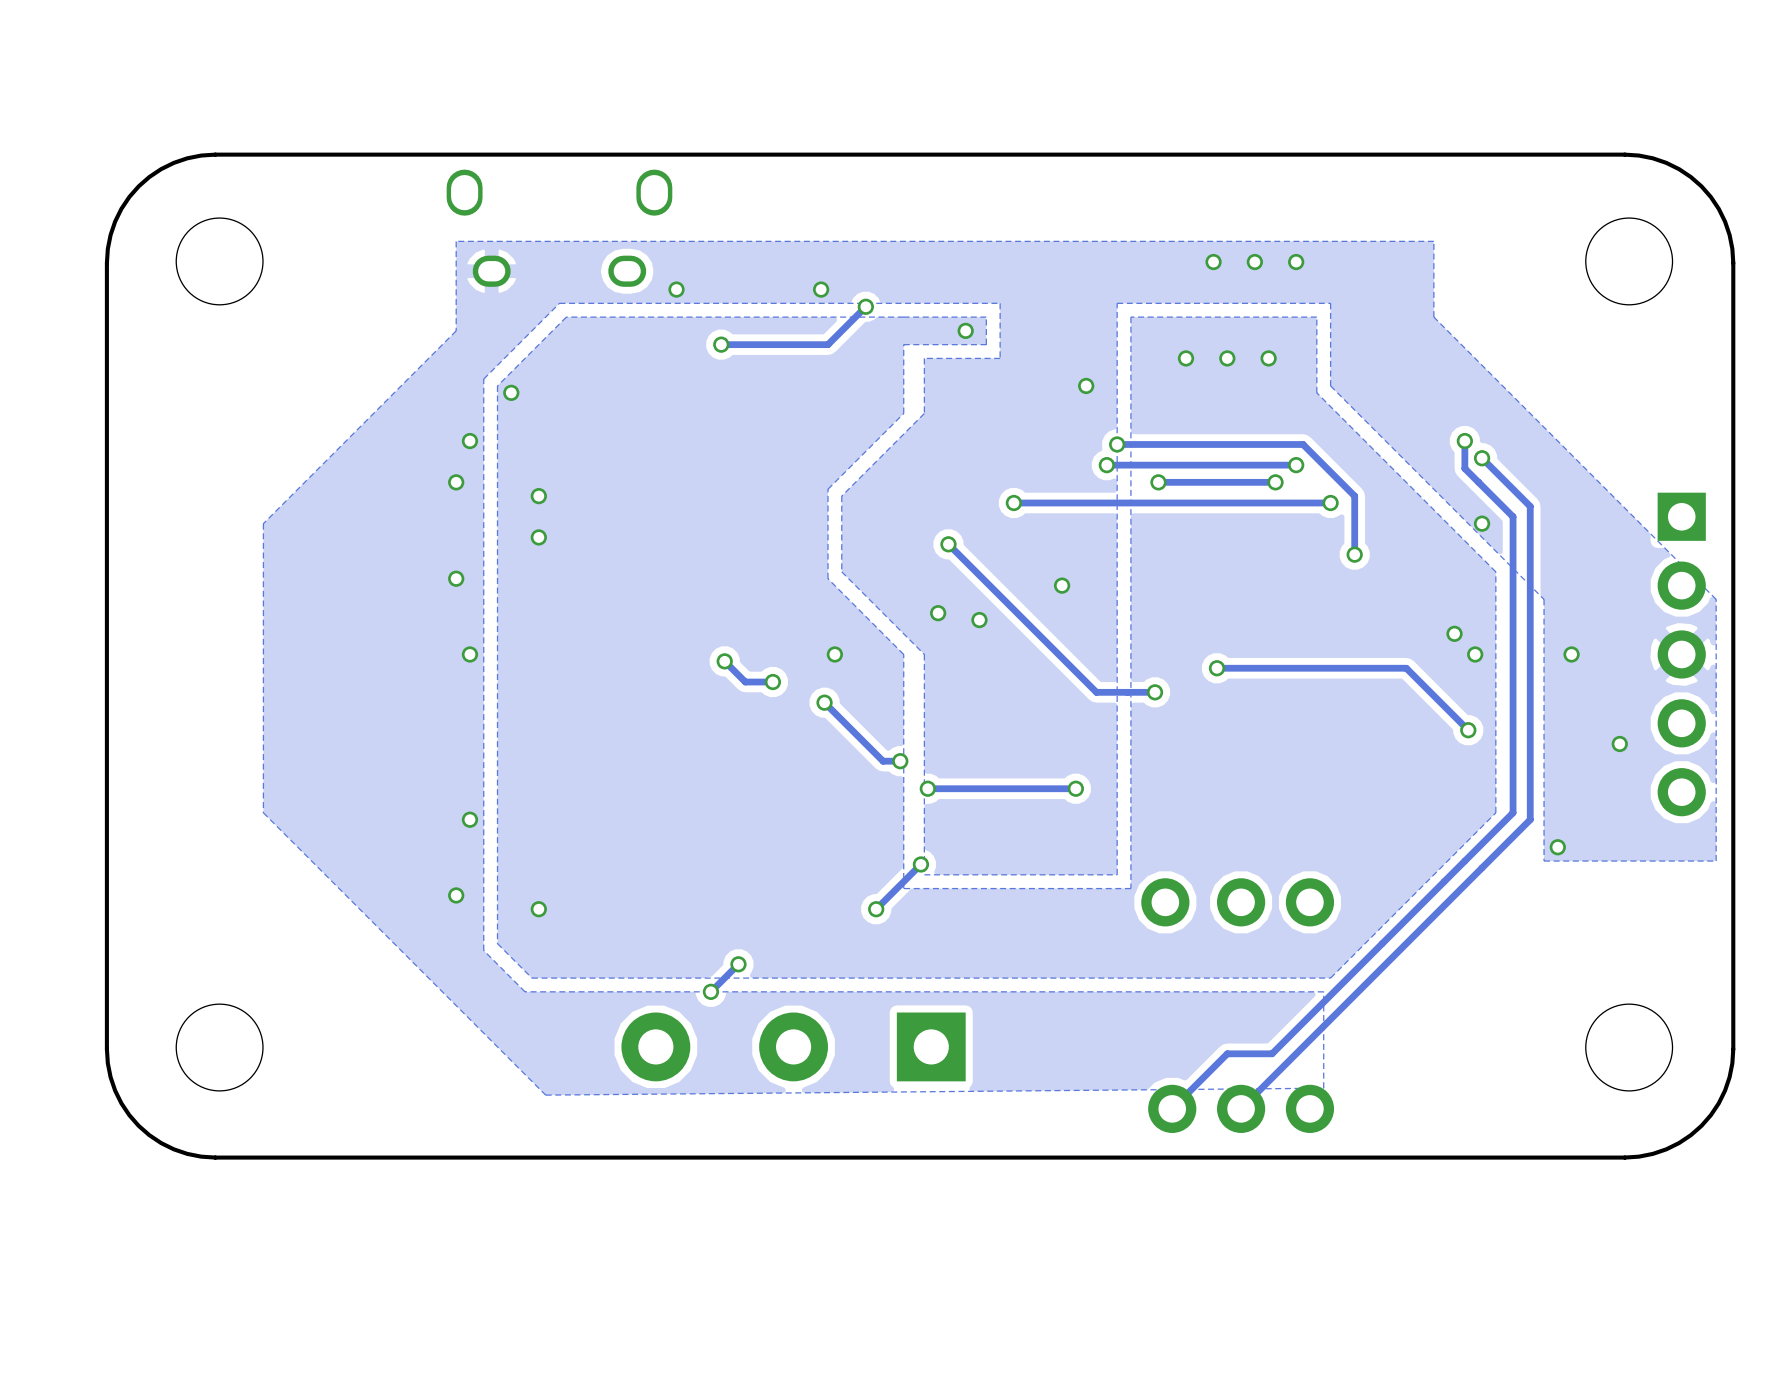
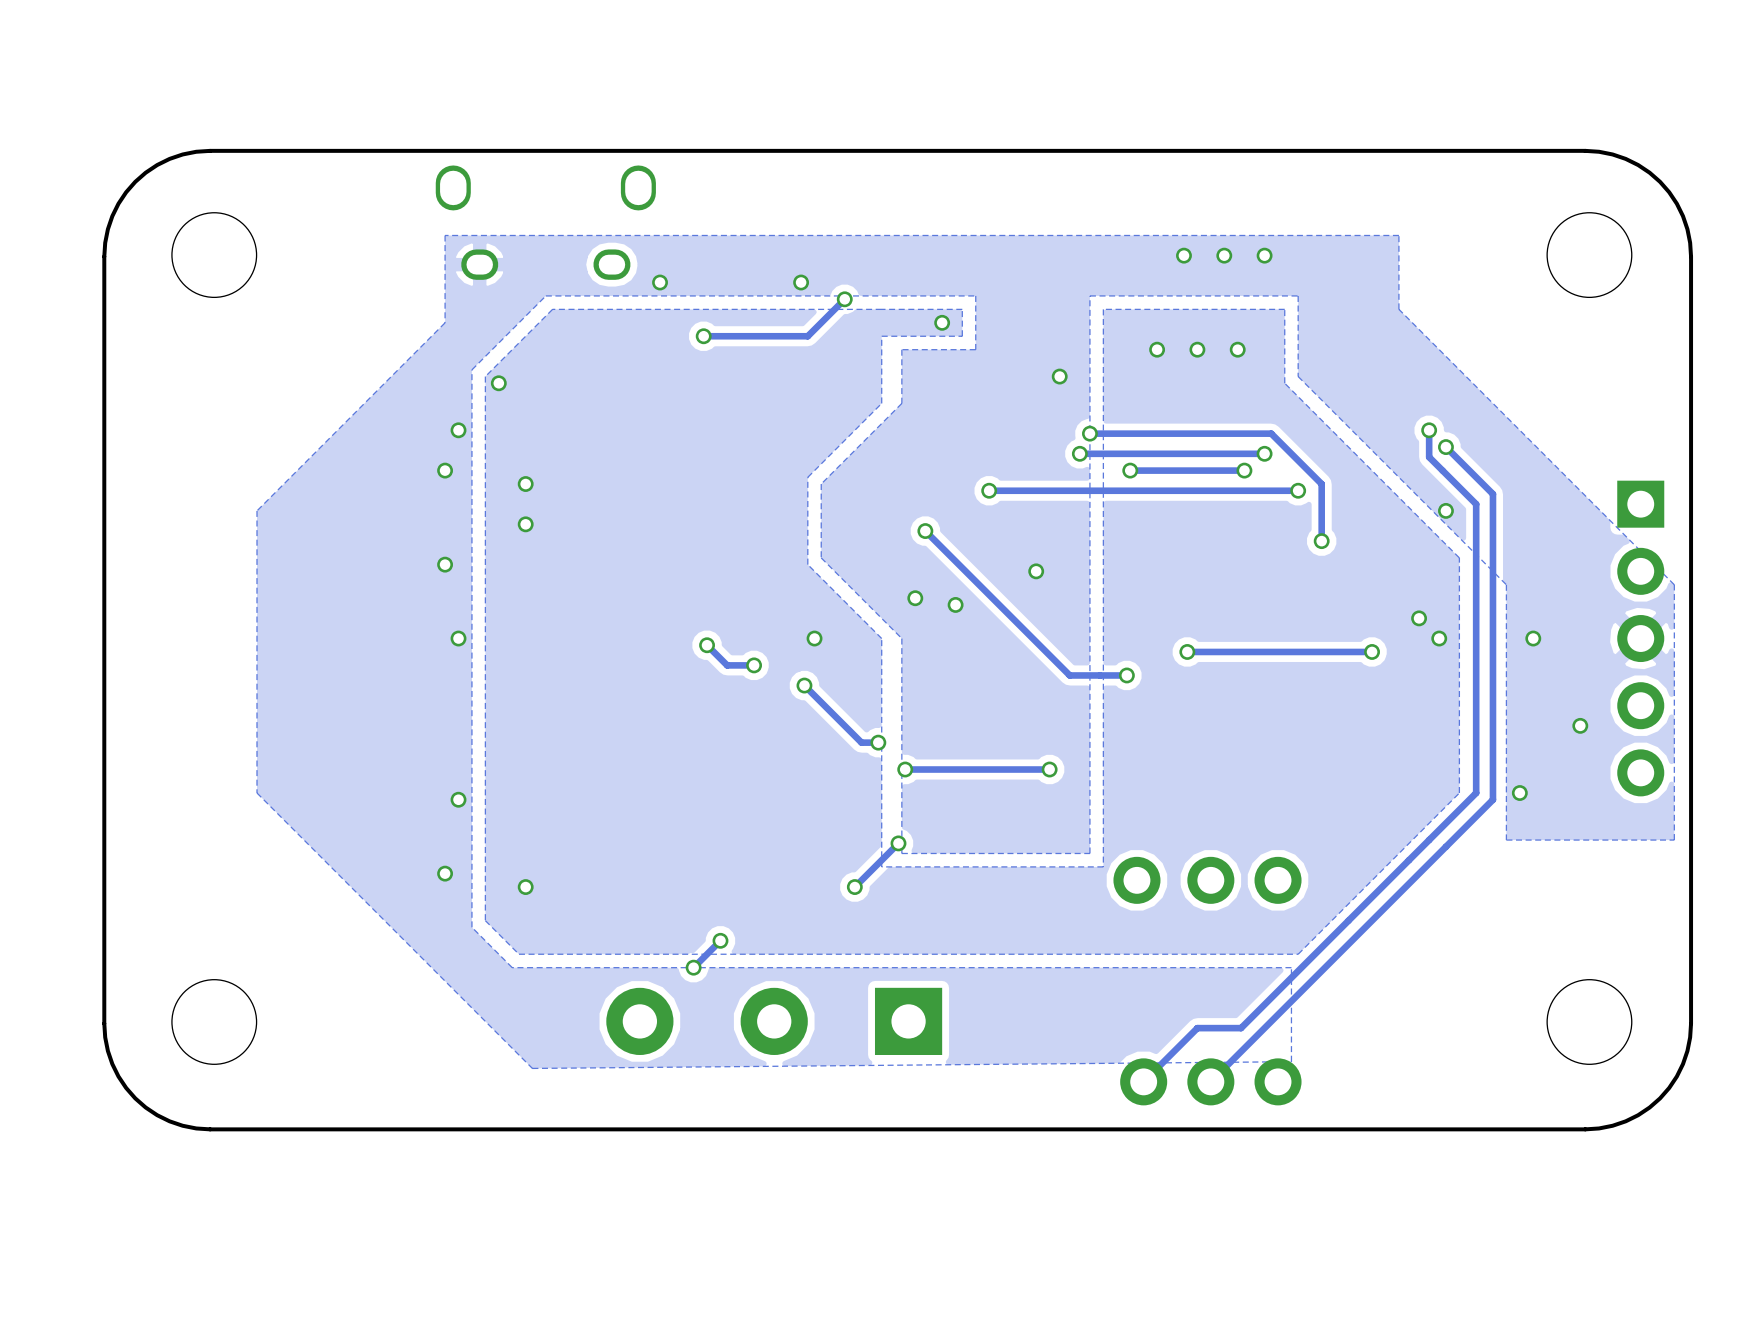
track: (1406, 668) (1468, 730) -> none
via: none -> (1372, 651)
via: (1468, 730) -> none
via position: (1557, 847) -> (1519, 793)

